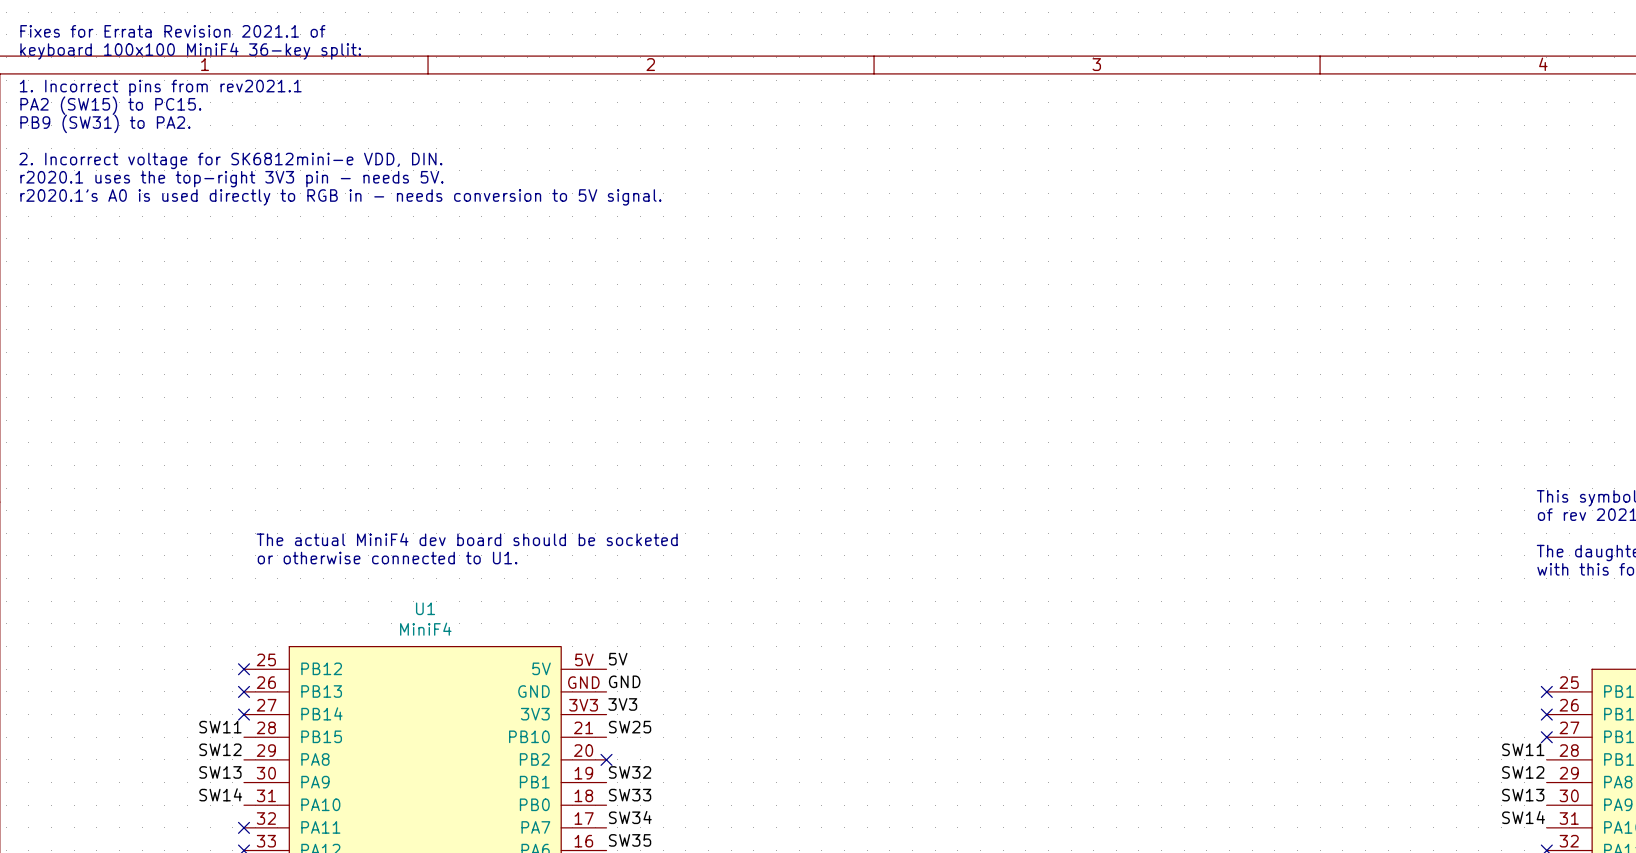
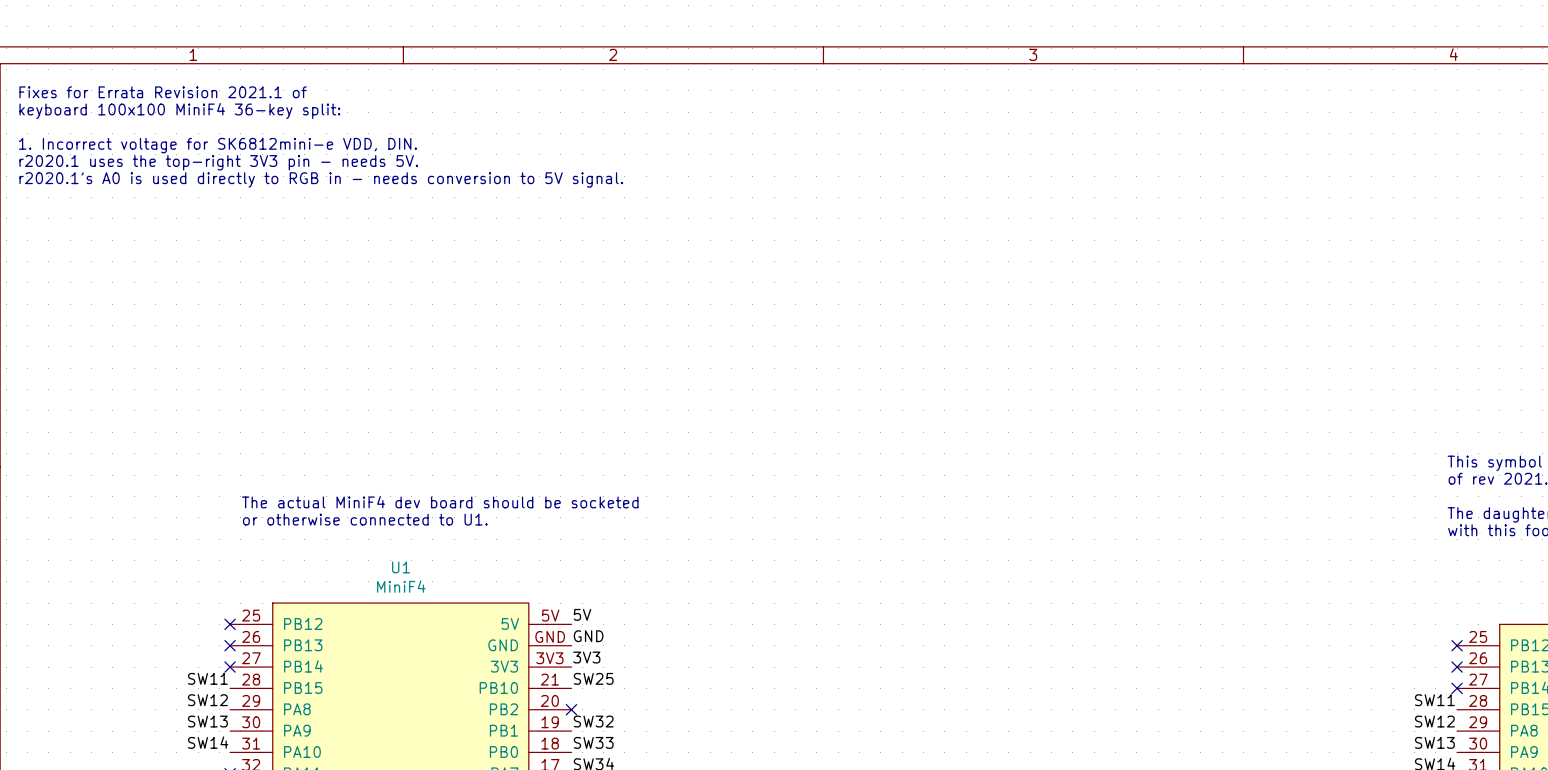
text: Fixes for Errata Revision 2021.1 of (172, 31) -> none
text: keyboard 100x100 MiniF4 36-key split: (190, 51) -> none
text: 1. Incorrect pins from rev2021.1 (160, 87) -> none
text: PA2 (SW15) to PC15. (110, 105) -> Fixes for Errata Revision 2021.1 of (163, 92)
text: PB9 (SW31) to PA2. (105, 123) -> keyboard 100x100 MiniF4 36-key split: (179, 111)
text: 2. Incorrect voltage for SK6812mini-e VDD, DIN. (230, 160) -> 1. Incorrect voltage for SK6812mini-e VDD, DIN. (217, 145)

